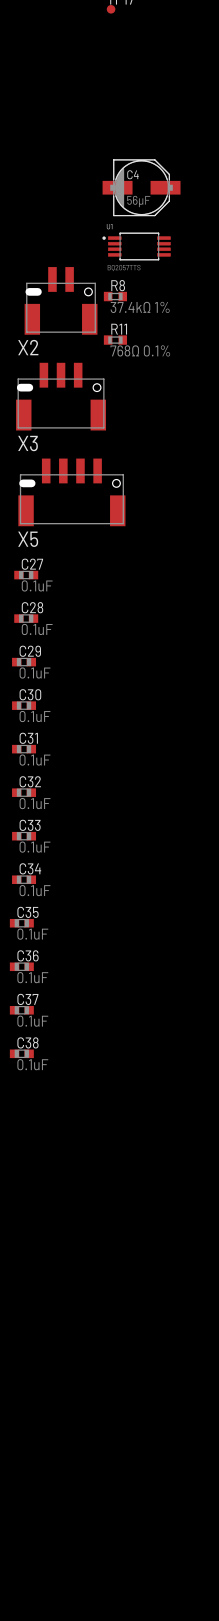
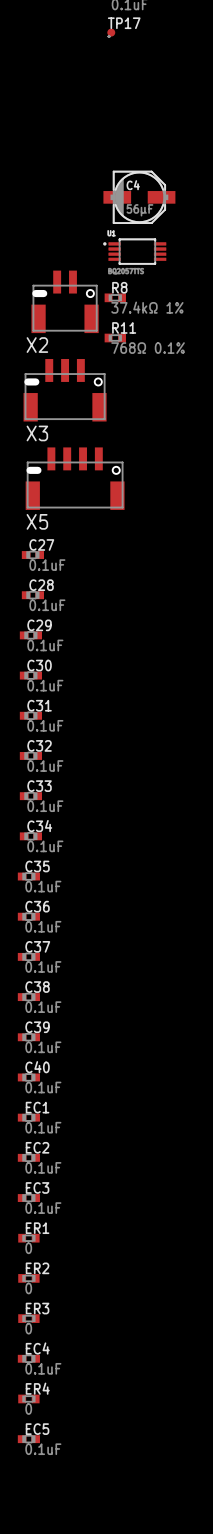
C39: none -> 0.1uF (28, 1037)
C40: none -> 0.1uF (28, 1077)
EC1: none -> 0.1uF (28, 1117)
EC2: none -> 0.1uF (28, 1157)
EC3: none -> 0.1uF (28, 1198)
ER1: none -> 0 (28, 1238)
ER2: none -> 0 (28, 1278)
ER3: none -> 0 (28, 1318)
EC4: none -> 0.1uF (28, 1358)
ER4: none -> 0 (28, 1398)
EC5: none -> 0.1uF (28, 1439)

